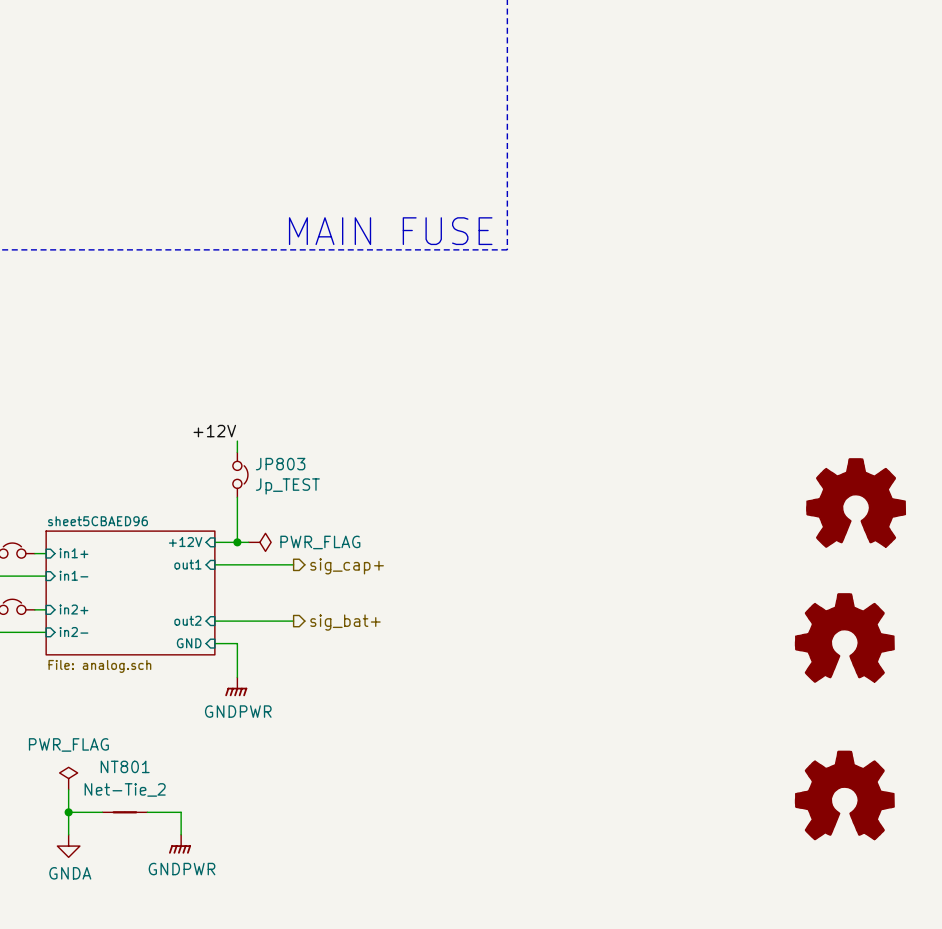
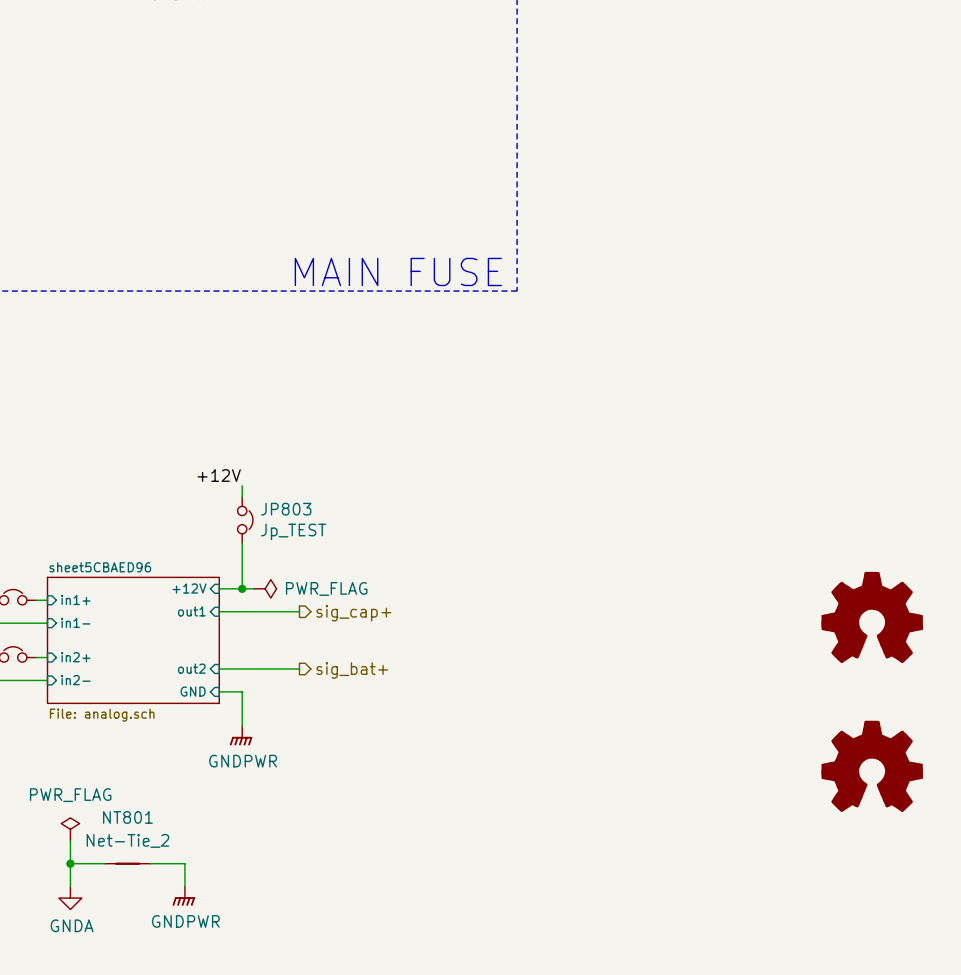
part: (856, 502) -> none
power symbol: none -> (872, 617)
part: (844, 637) -> none
power symbol: none -> (872, 766)
part: (844, 795) -> none

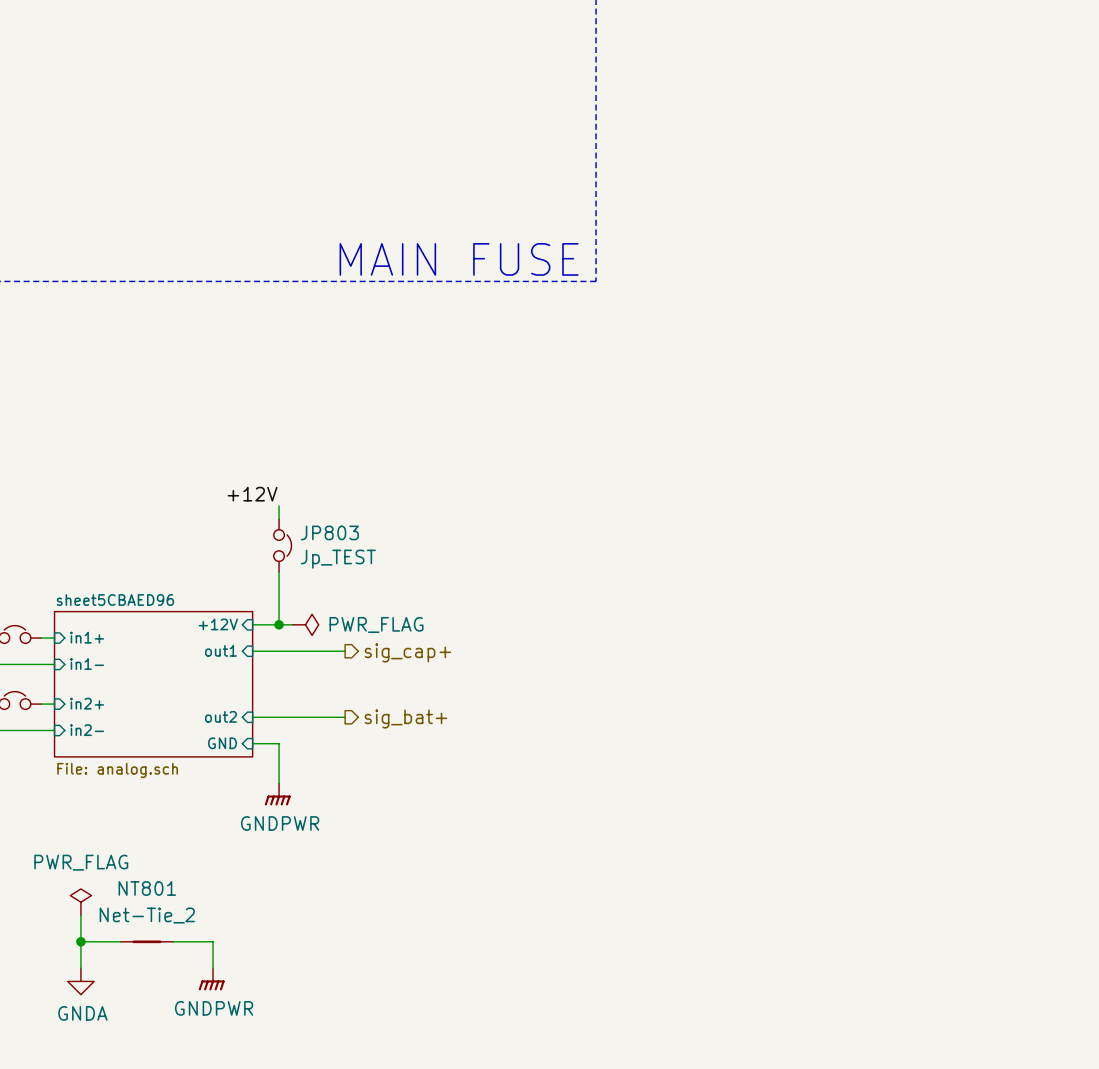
power symbol: (872, 617) -> none
power symbol: (872, 766) -> none

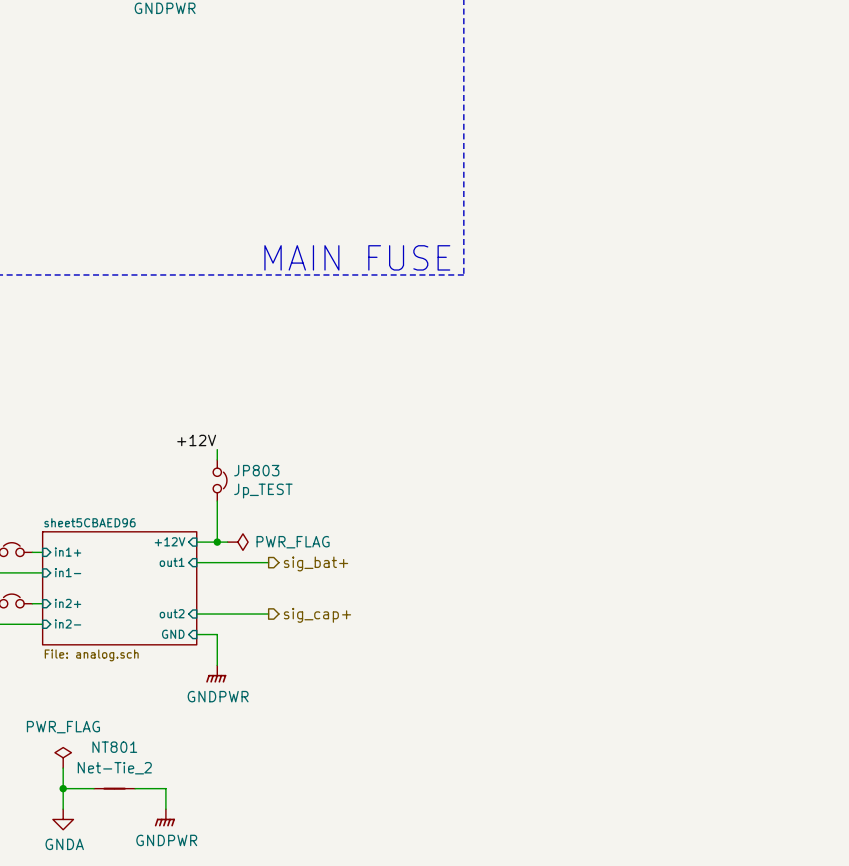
hierarchical label: sig_cap+ (407, 652) -> sig_bat+ (316, 563)
hierarchical label: sig_bat+ (405, 718) -> sig_cap+ (317, 615)

